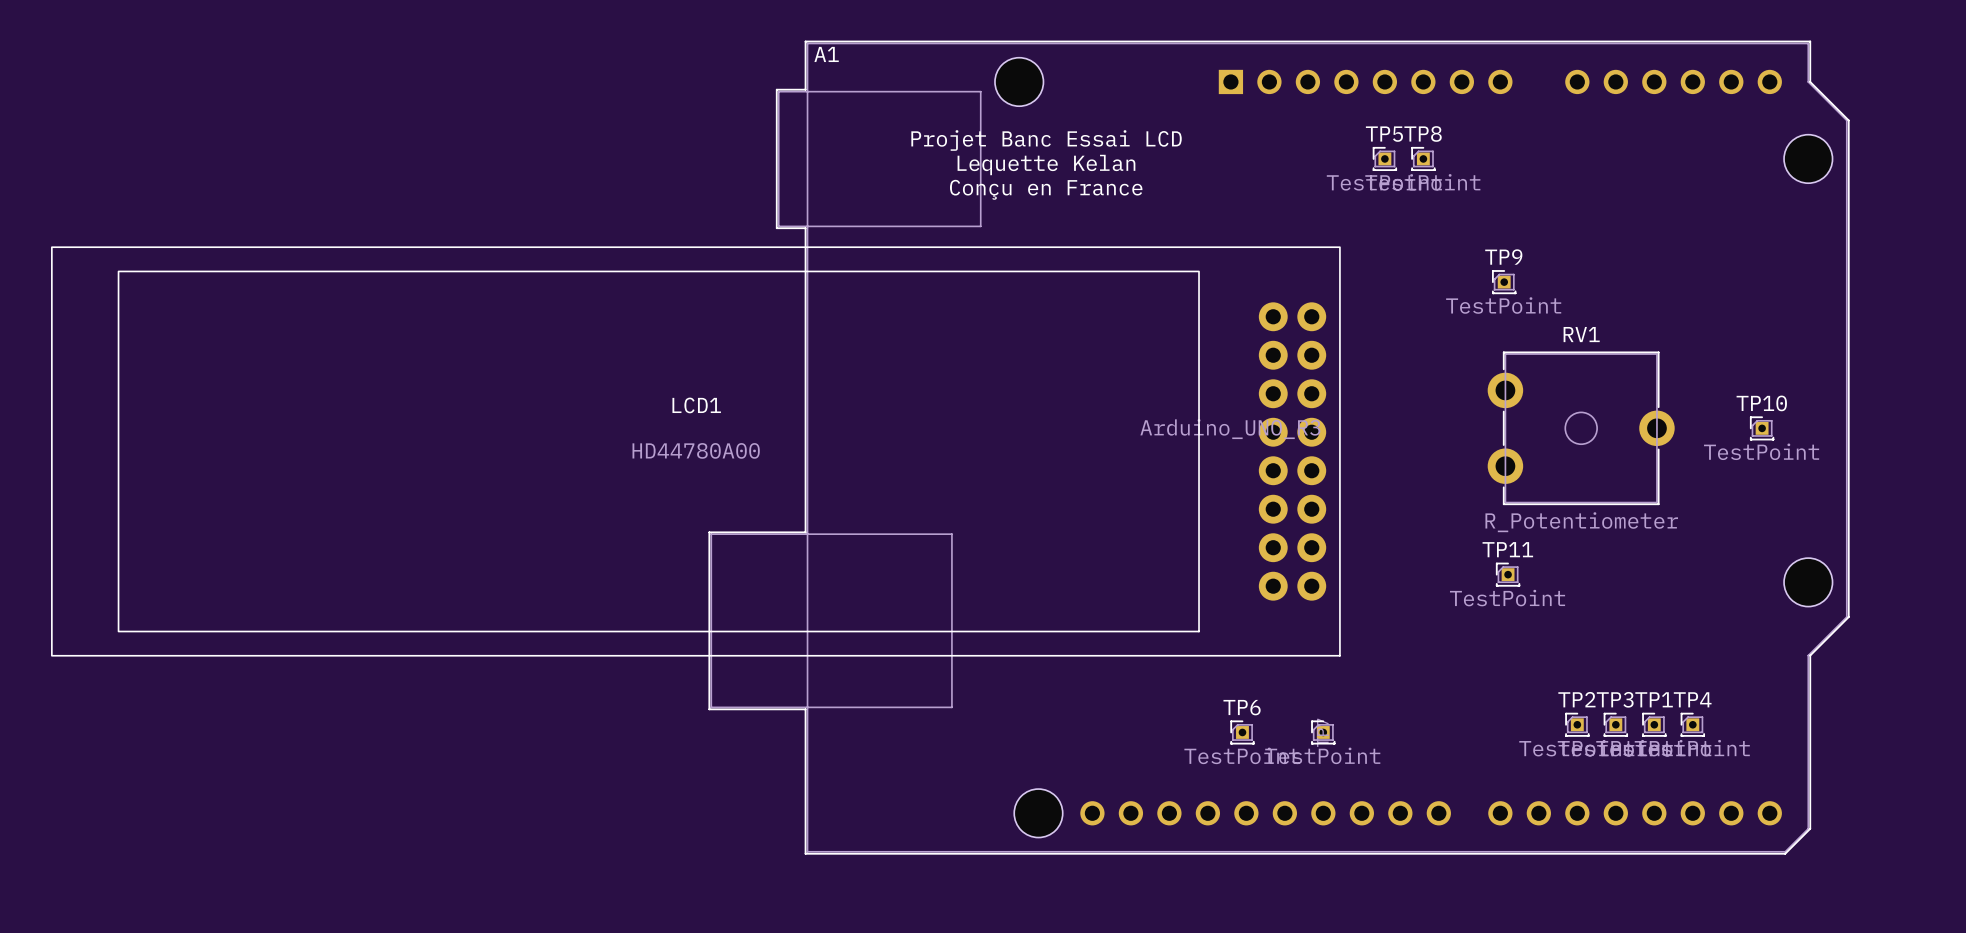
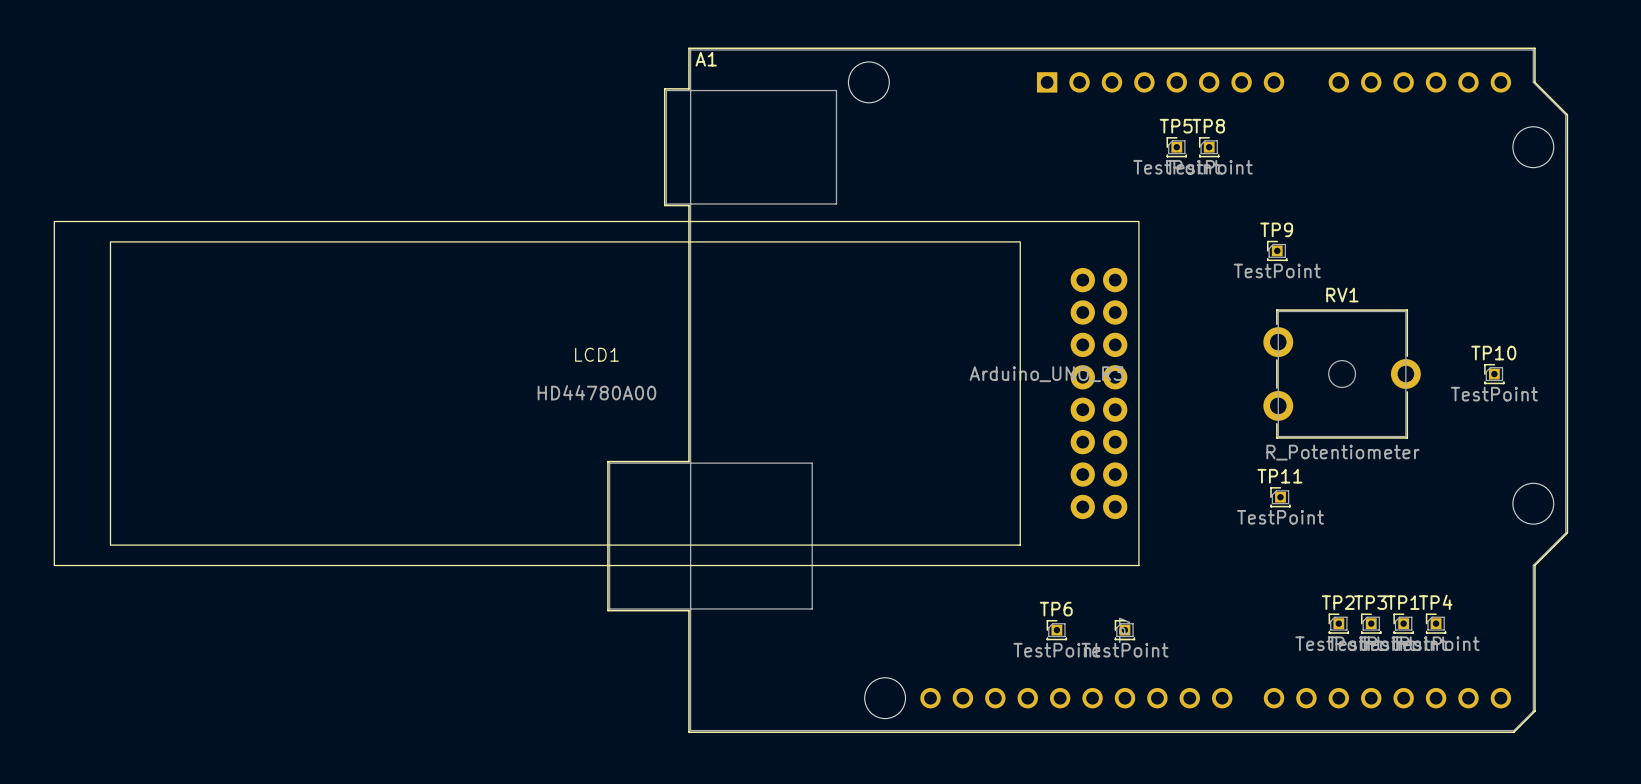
text: Projet Banc Essai LCD (1046, 140) -> none
text: Lequette Kelan (1046, 164) -> none
text: Conçu en France (1046, 189) -> none

